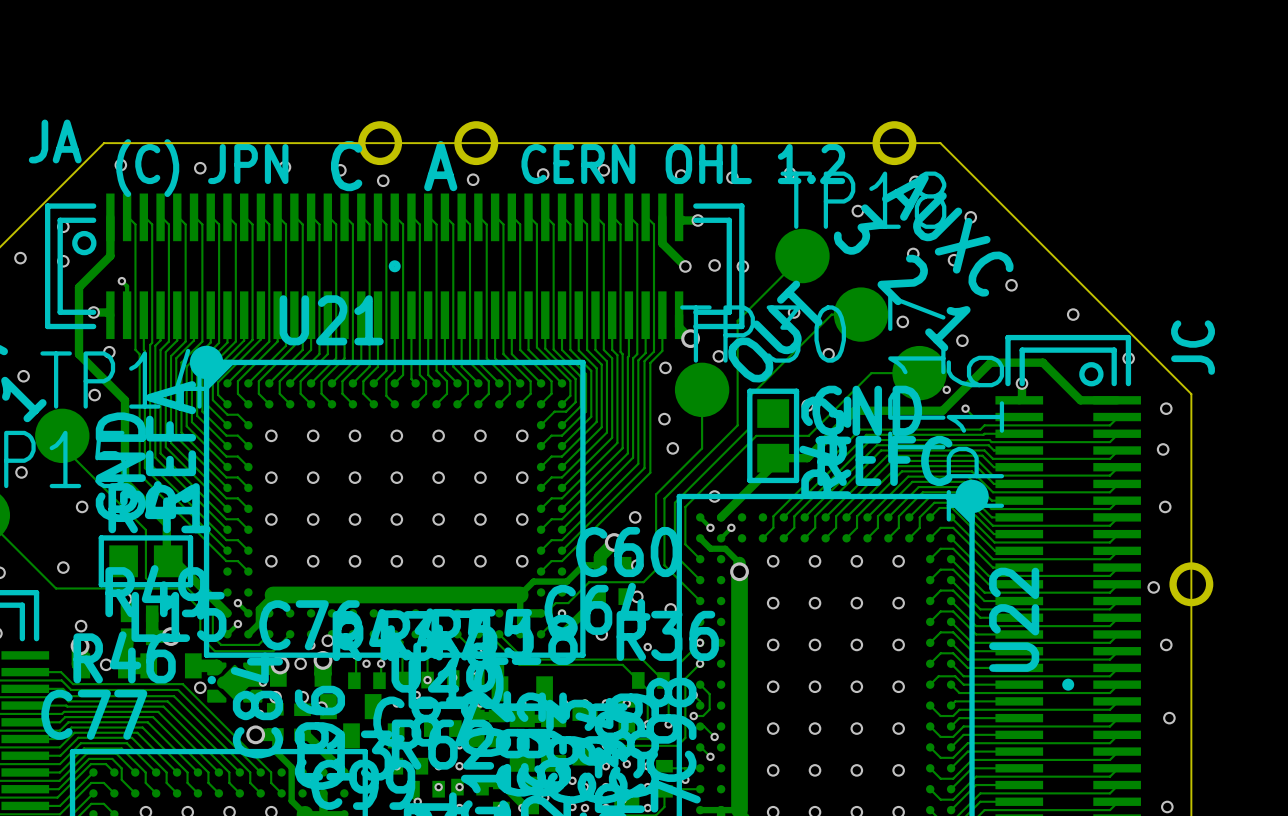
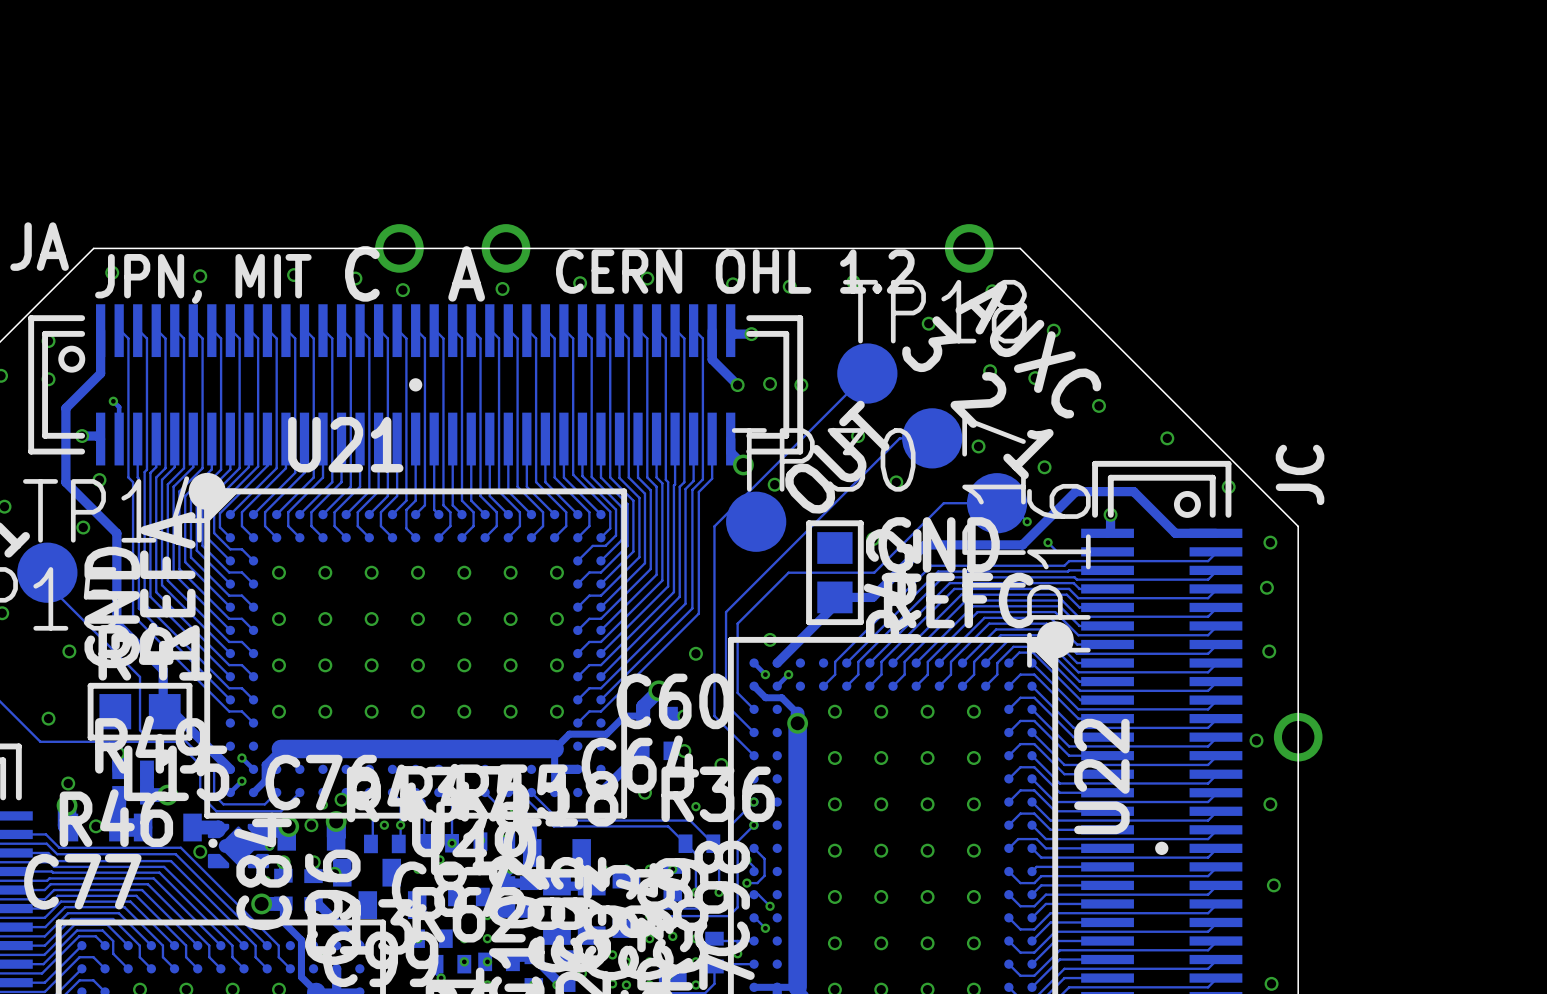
text: (C) JPN (202, 168) -> JPN, MIT (203, 278)
track: (737, 320) (737, 425) (664, 498) -> (795, 445) (714, 526) (714, 642)
via: (665, 367) -> none
track: (702, 389) (702, 448) (656, 494) (656, 569) (643, 582) (589, 582) (568, 603) (555, 603) (551, 607) (551, 623) (541, 634) -> none
track: (748, 398) (748, 429) (674, 502) -> (807, 531) (726, 612) (726, 646)
via: (664, 419) -> none
track: (756, 435) (685, 506) -> (816, 572) (788, 572) (737, 623) (737, 651)
via: (672, 448) -> none
via position: (635, 517) -> (695, 653)
via: (562, 613) -> none

